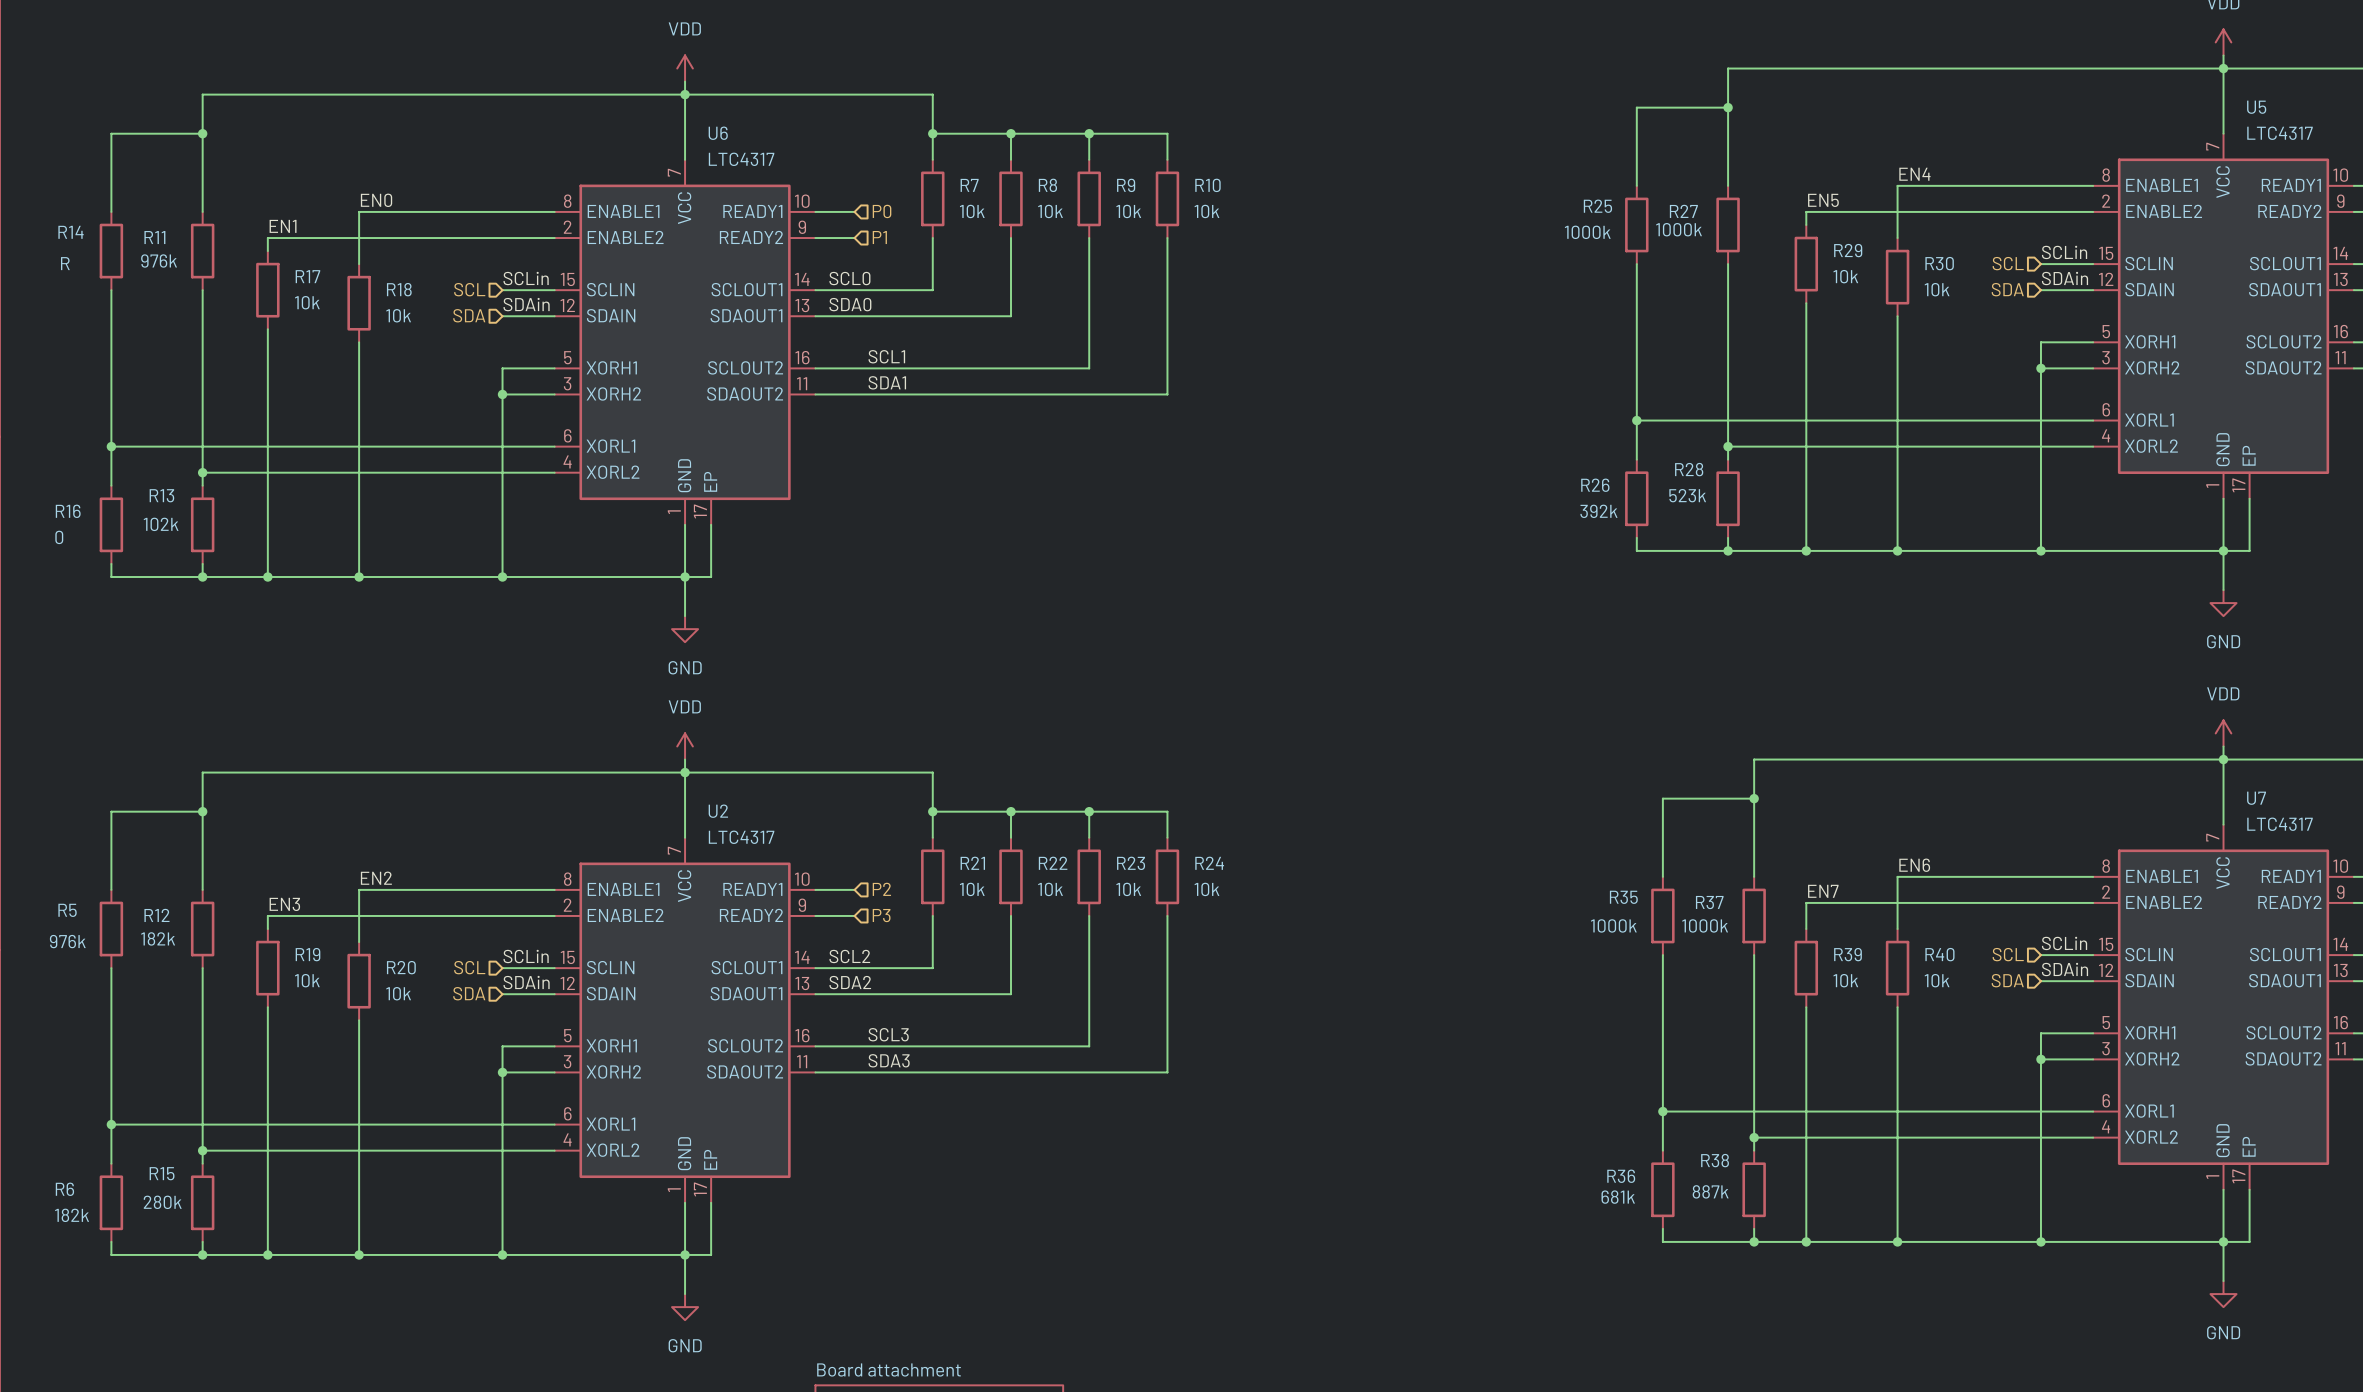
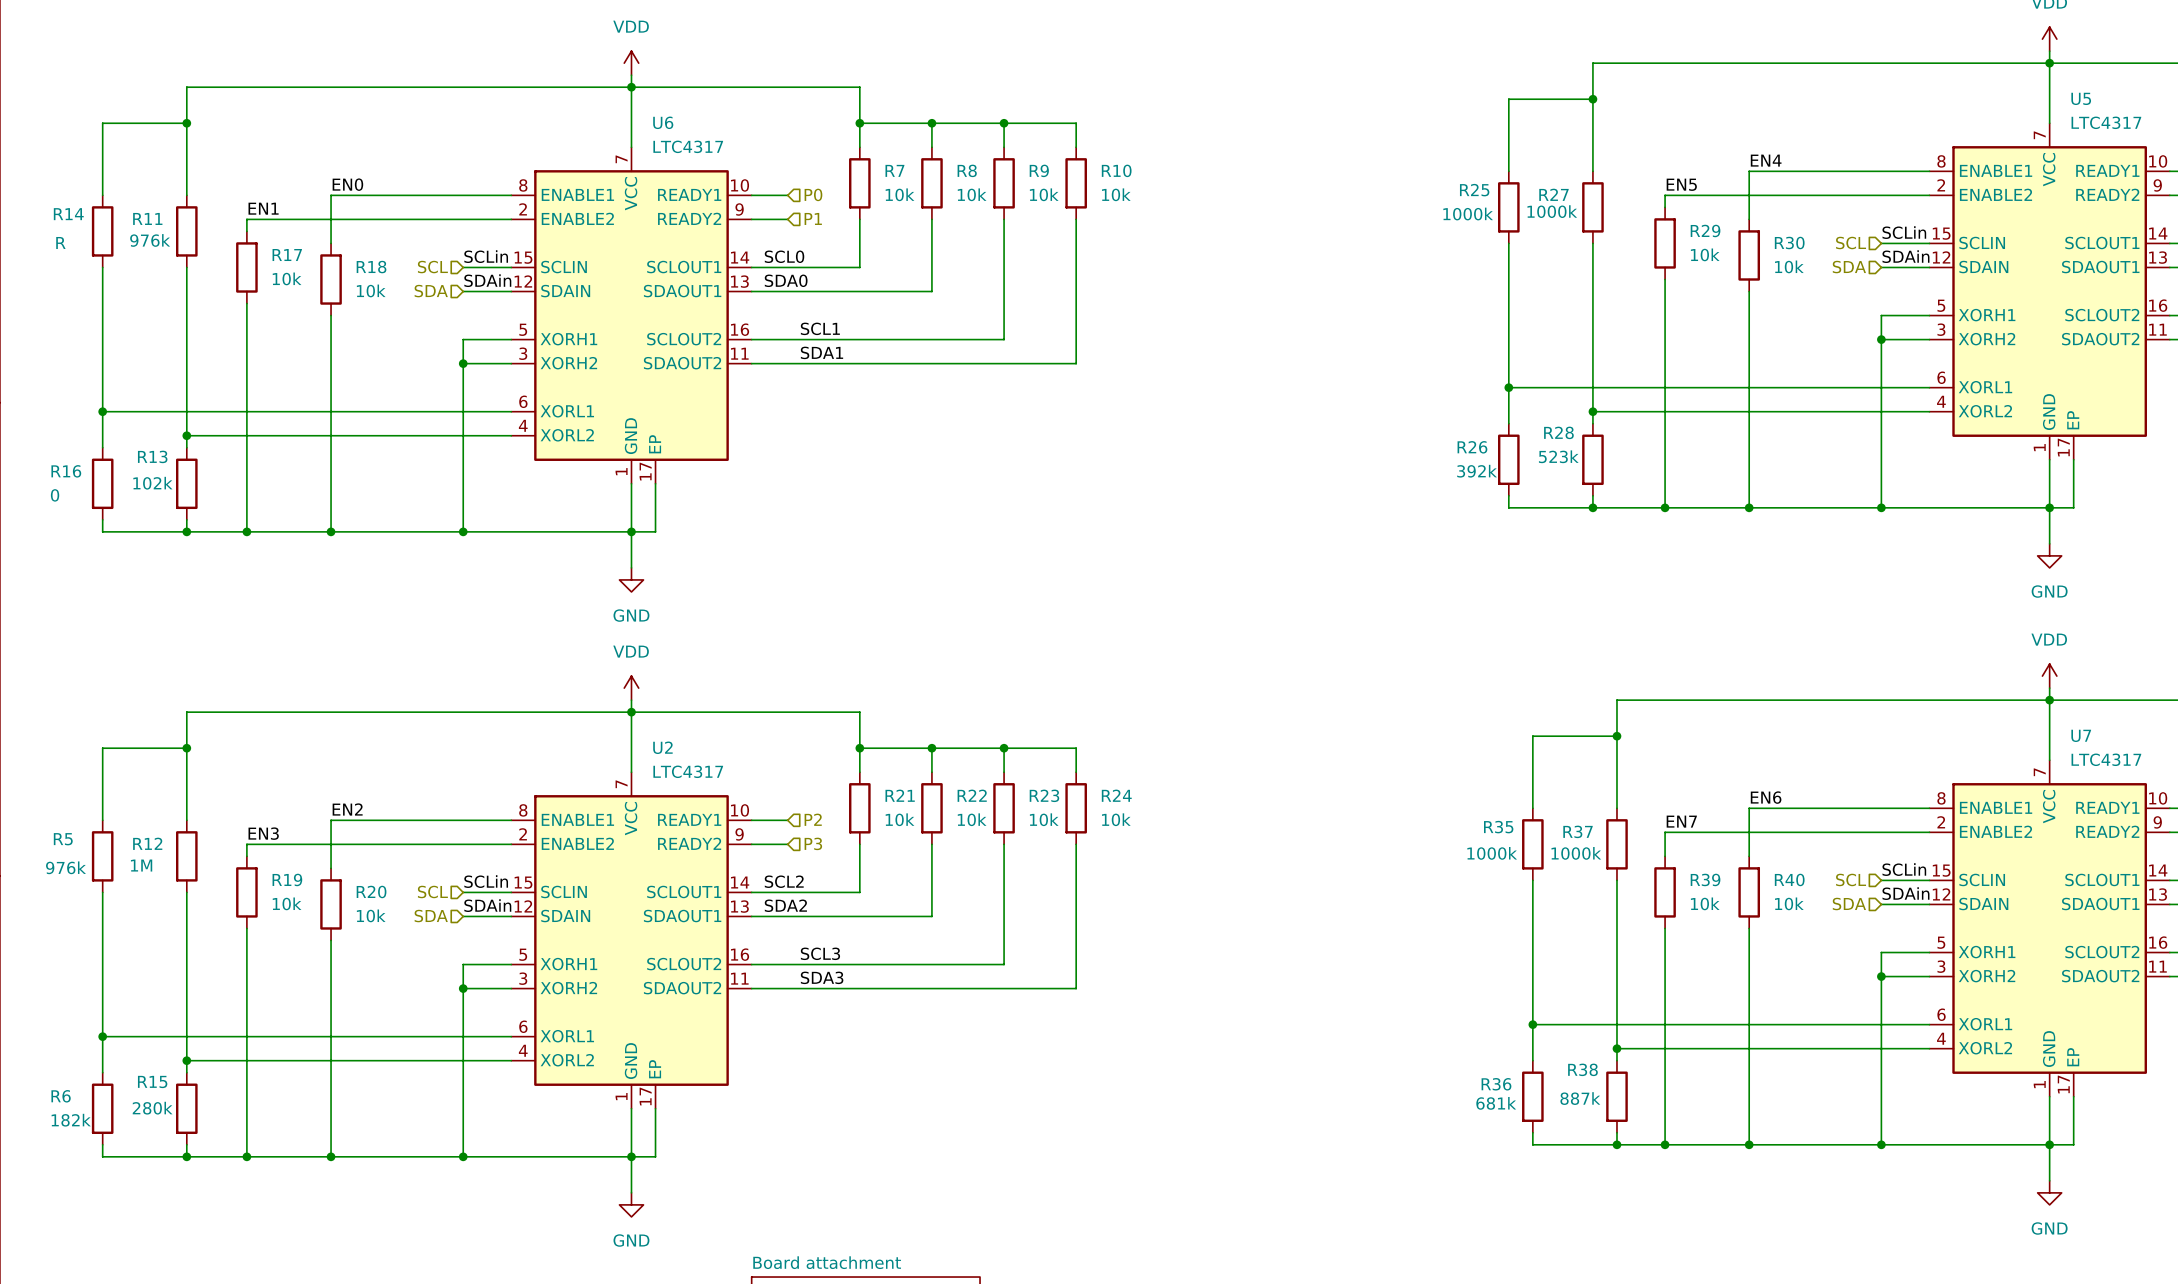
R12 value: 182k (158, 938) -> 1M (141, 865)

